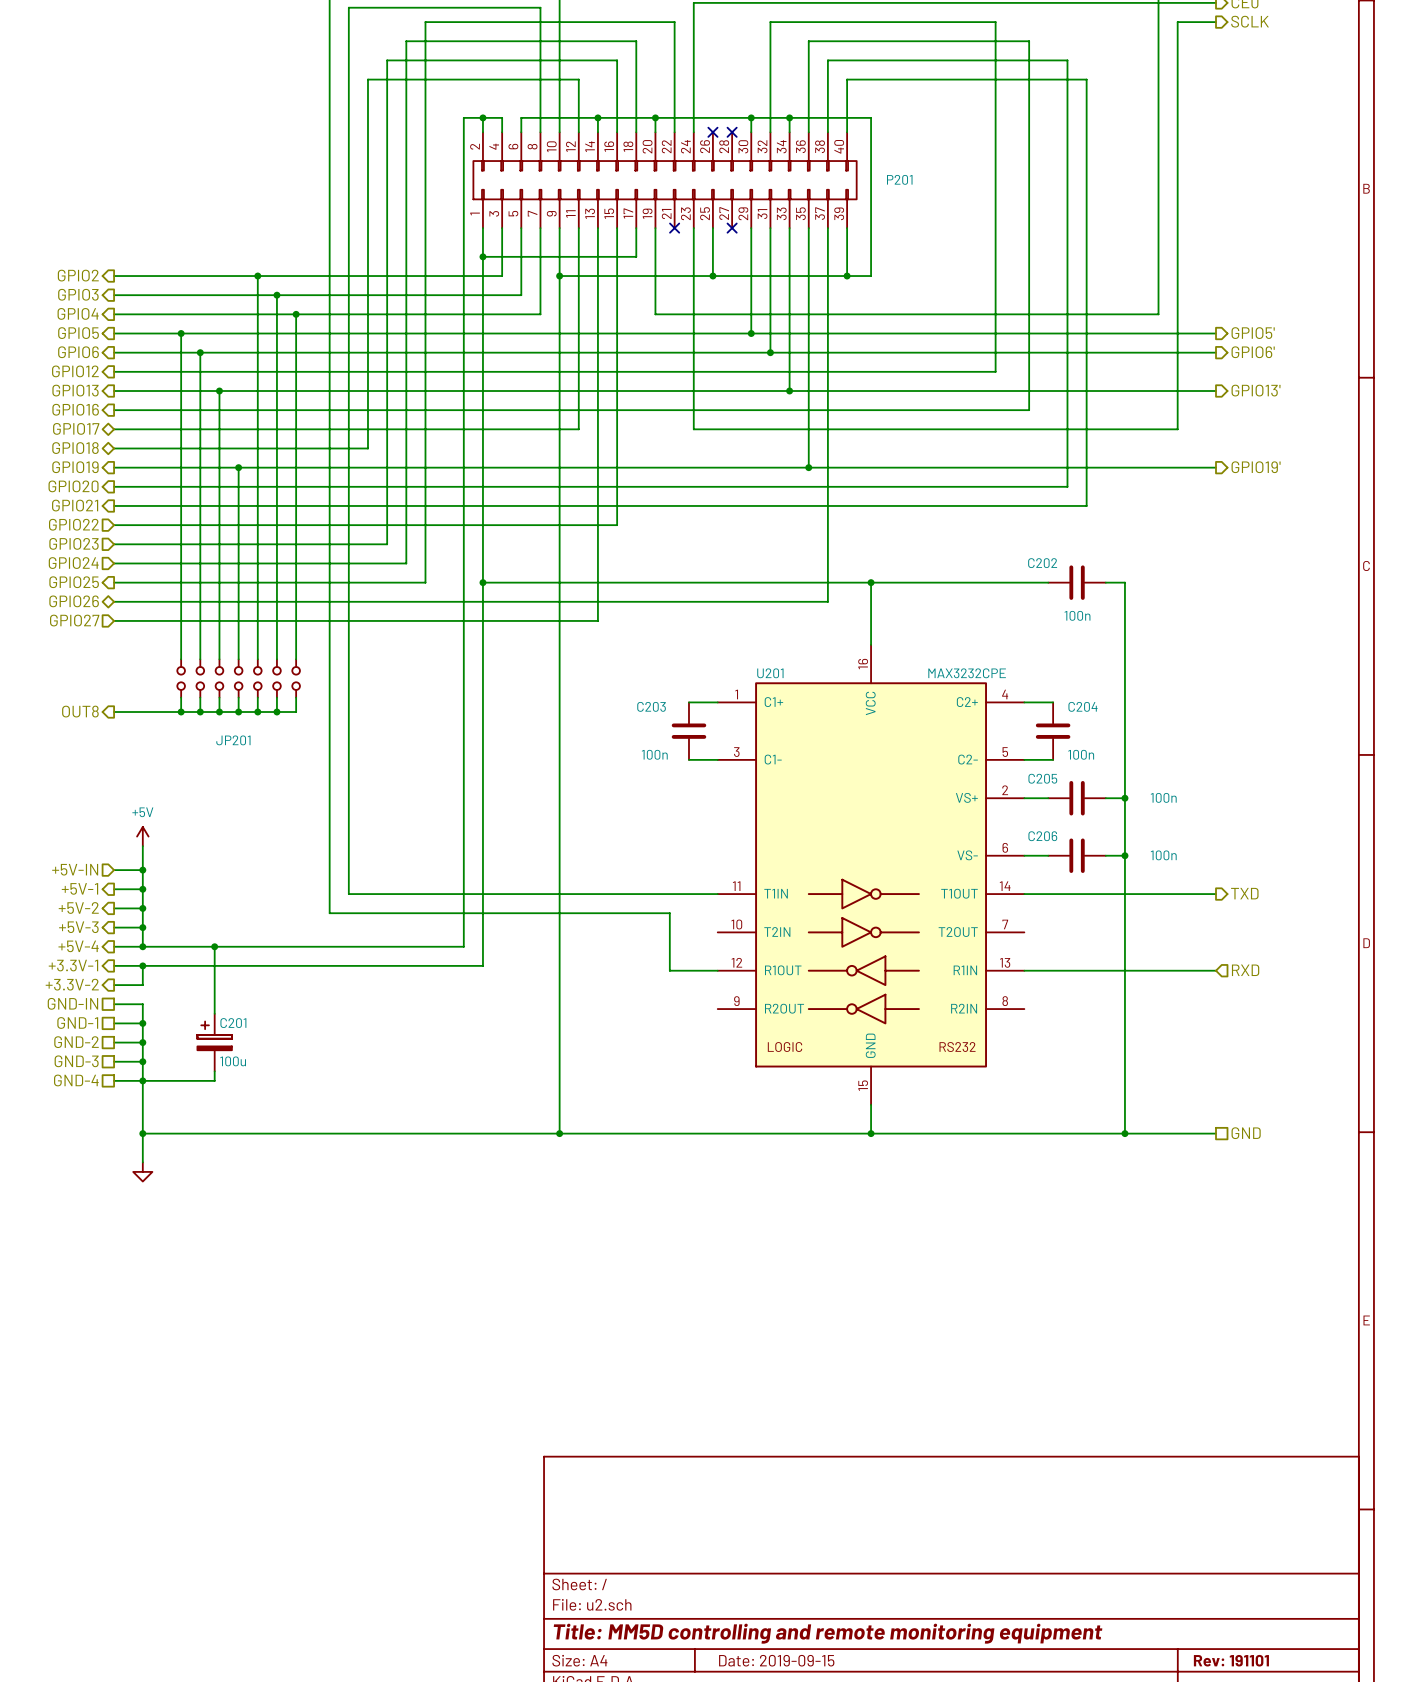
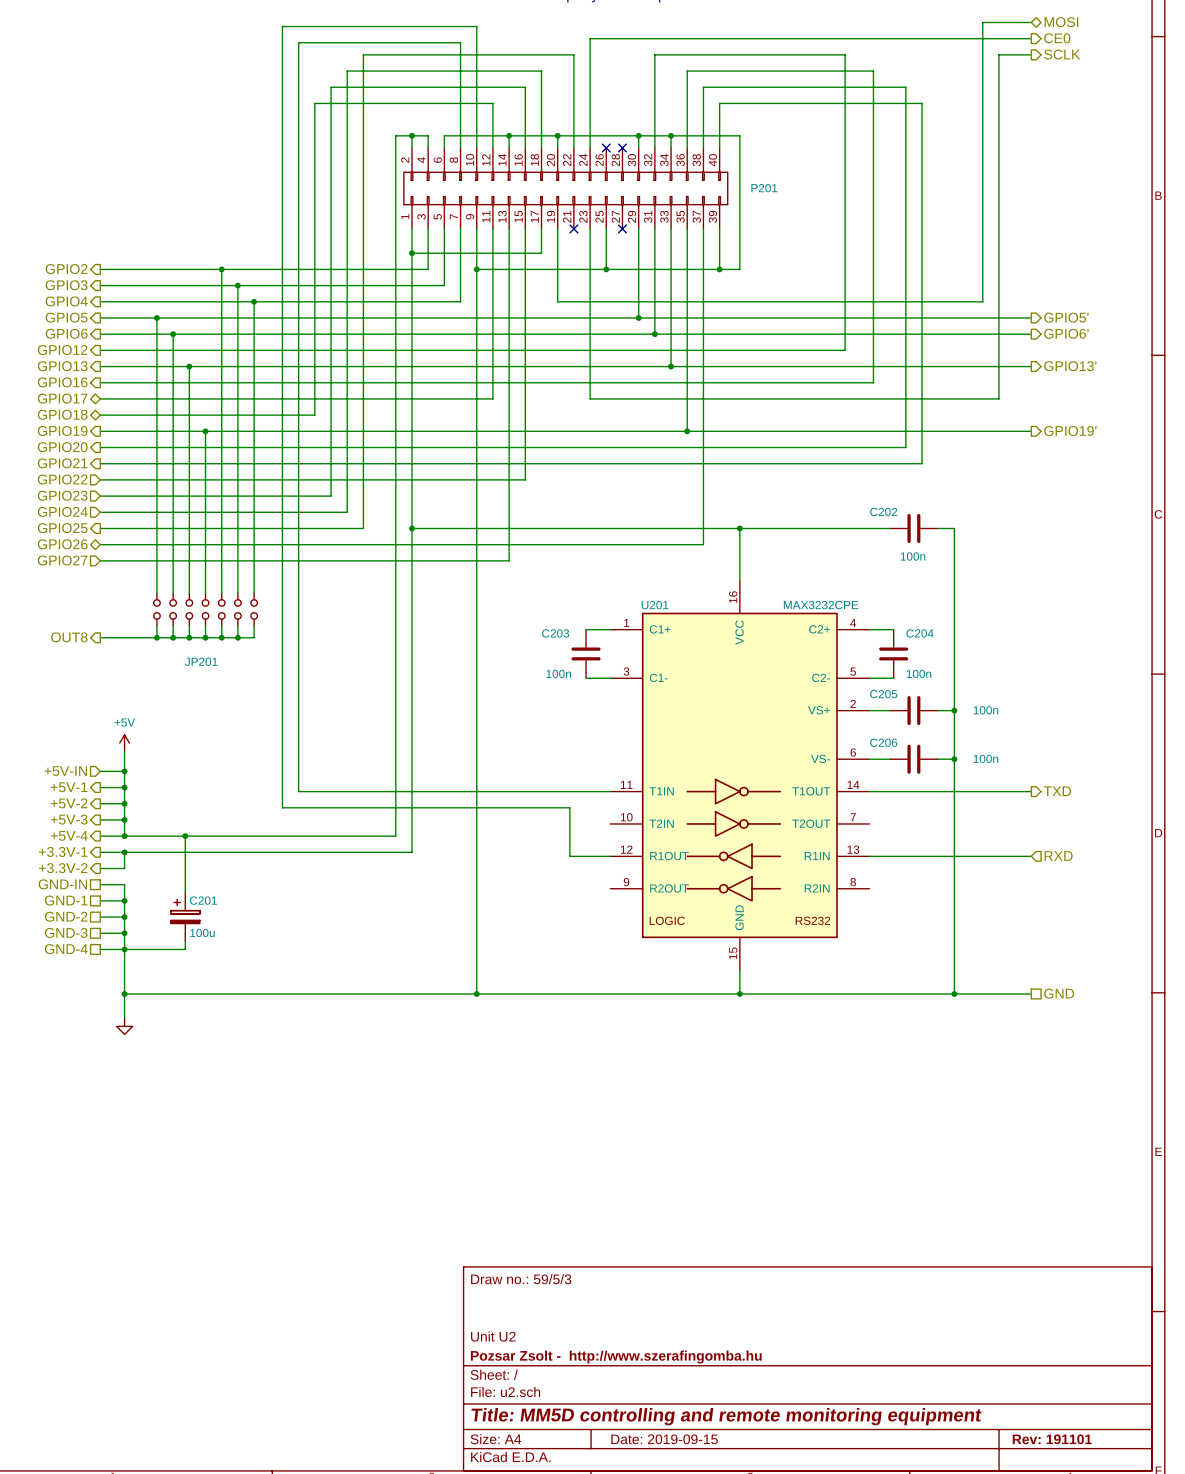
title block: none -> Draw no.: 59/5/3 (521, 1279)
title block: none -> Unit U2 (493, 1336)
title block: none -> Pozsar Zsolt - http://www.szerafingomba.hu (616, 1357)

